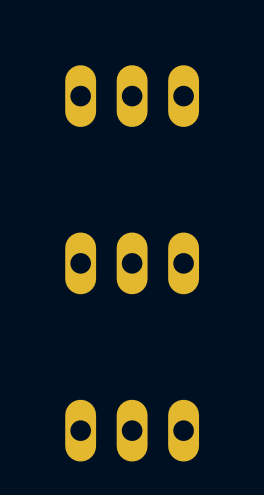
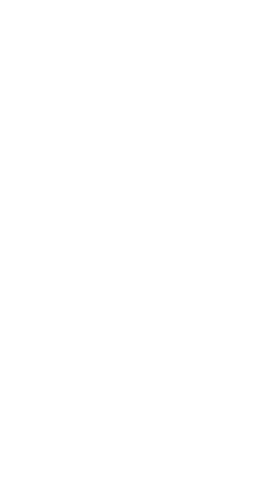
part: (132, 96) -> none
part: (132, 263) -> none
part: (132, 430) -> none

